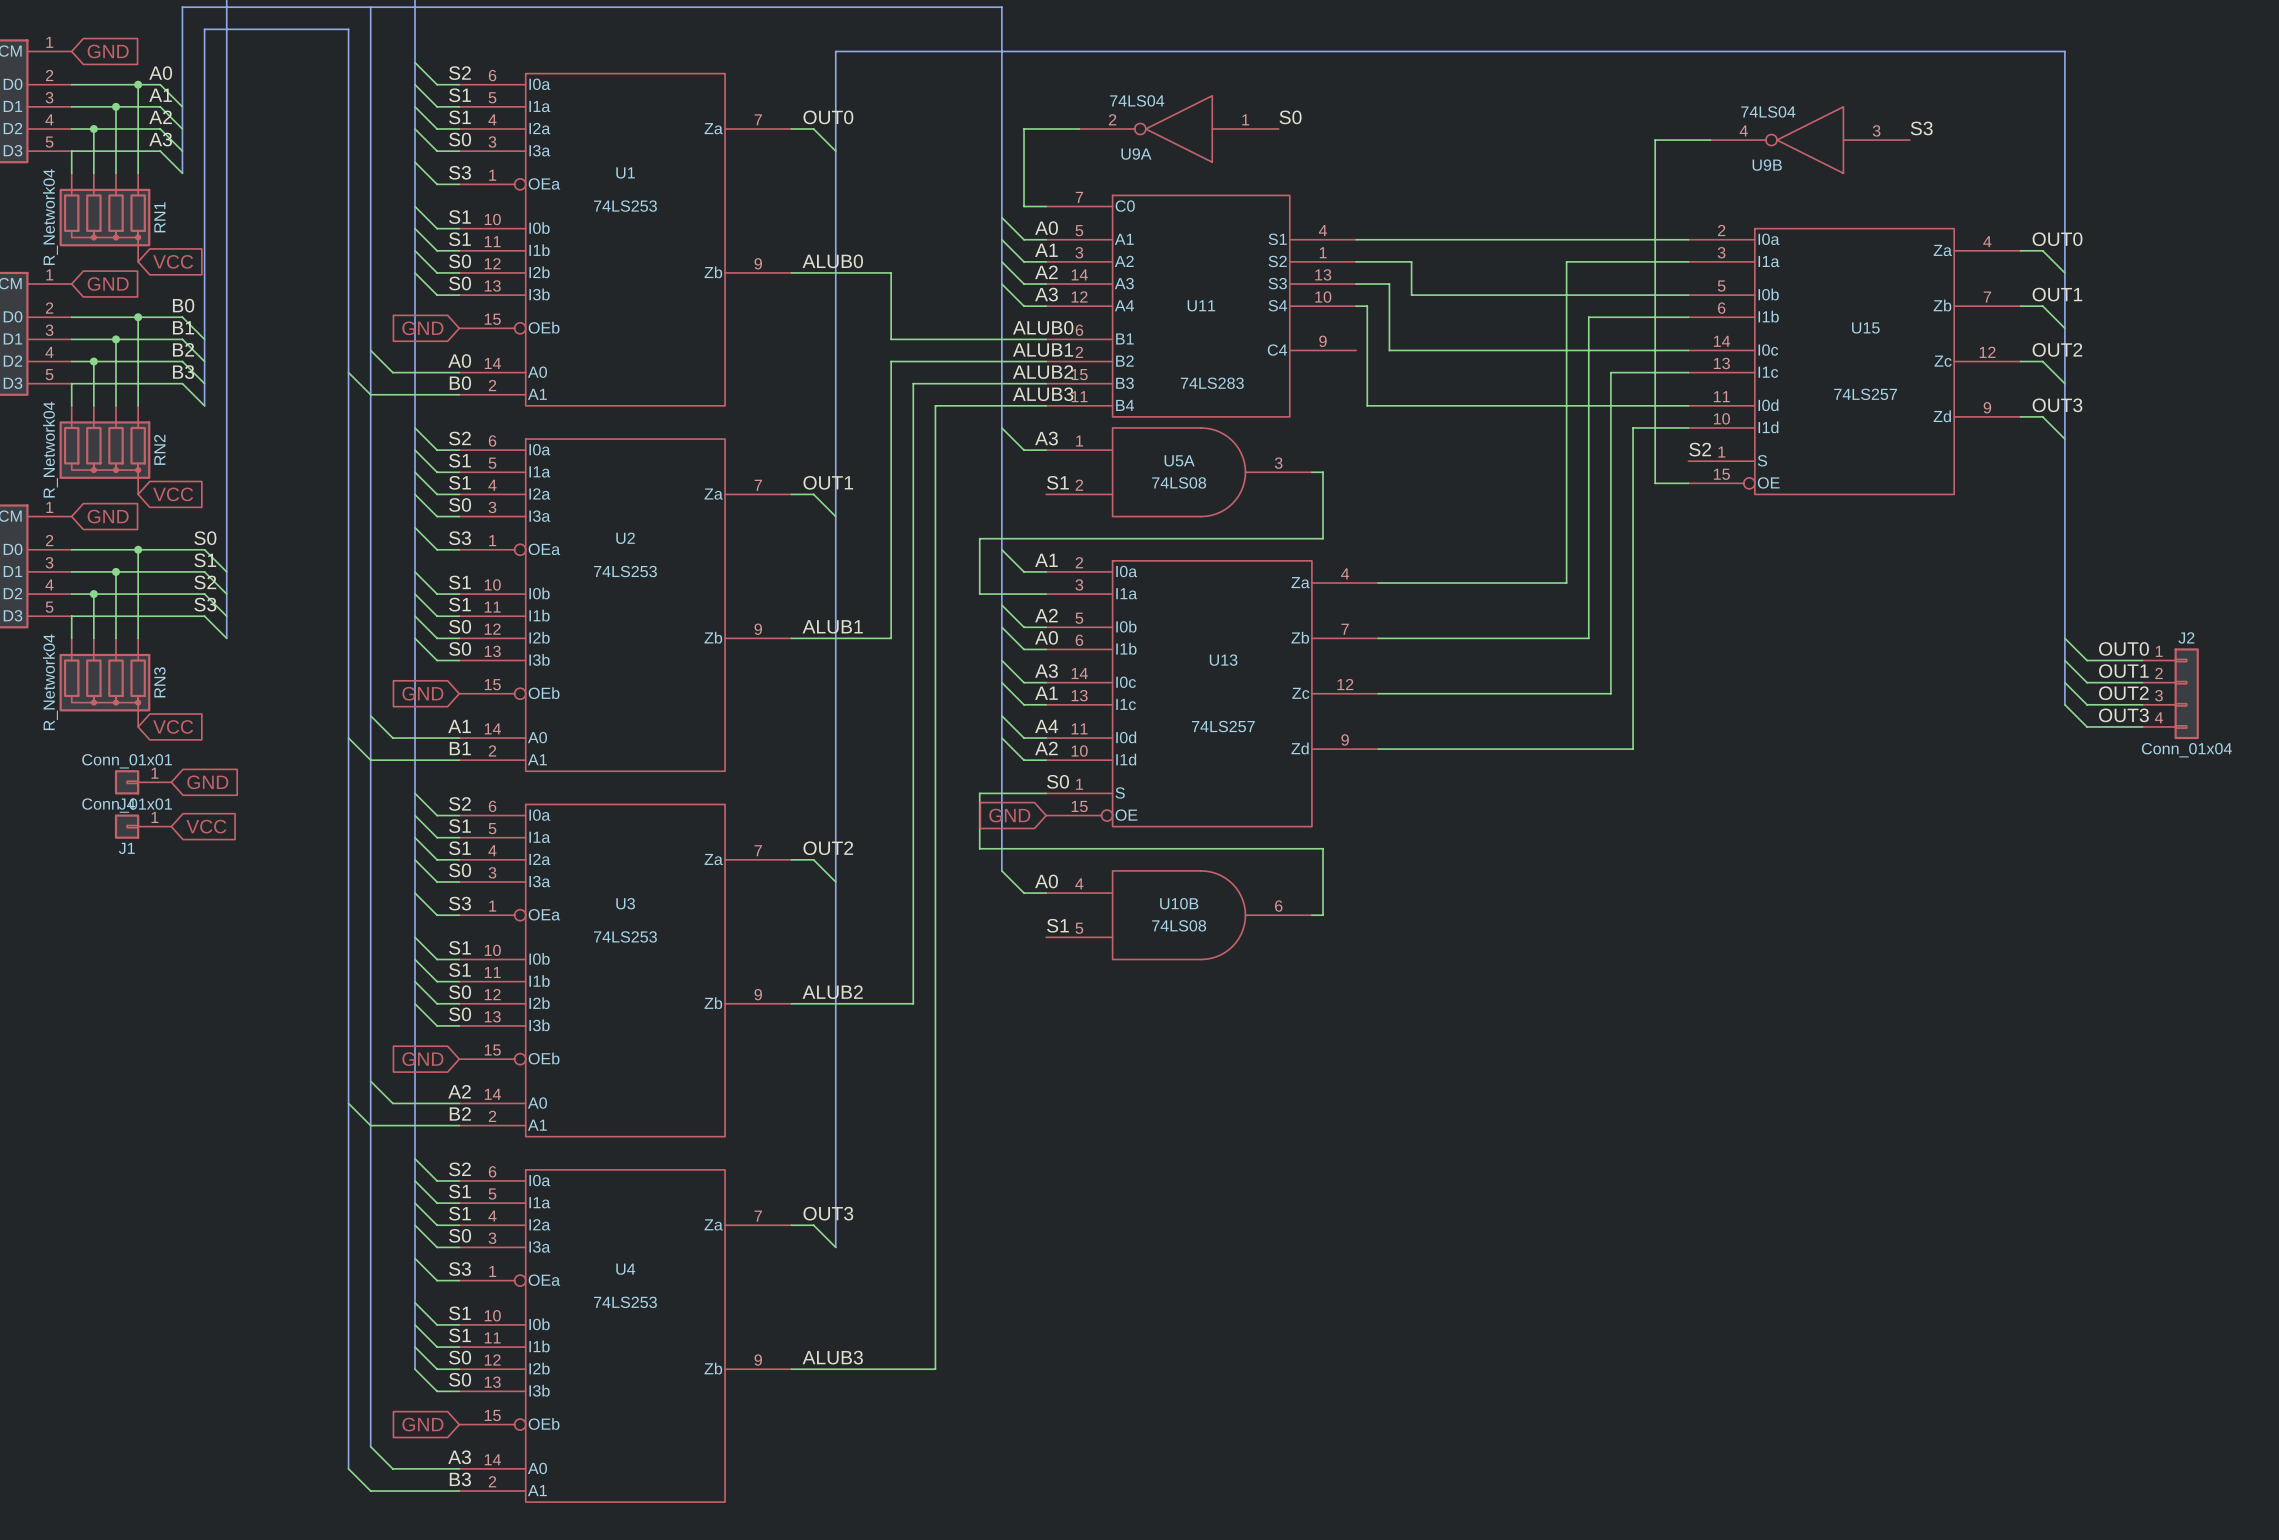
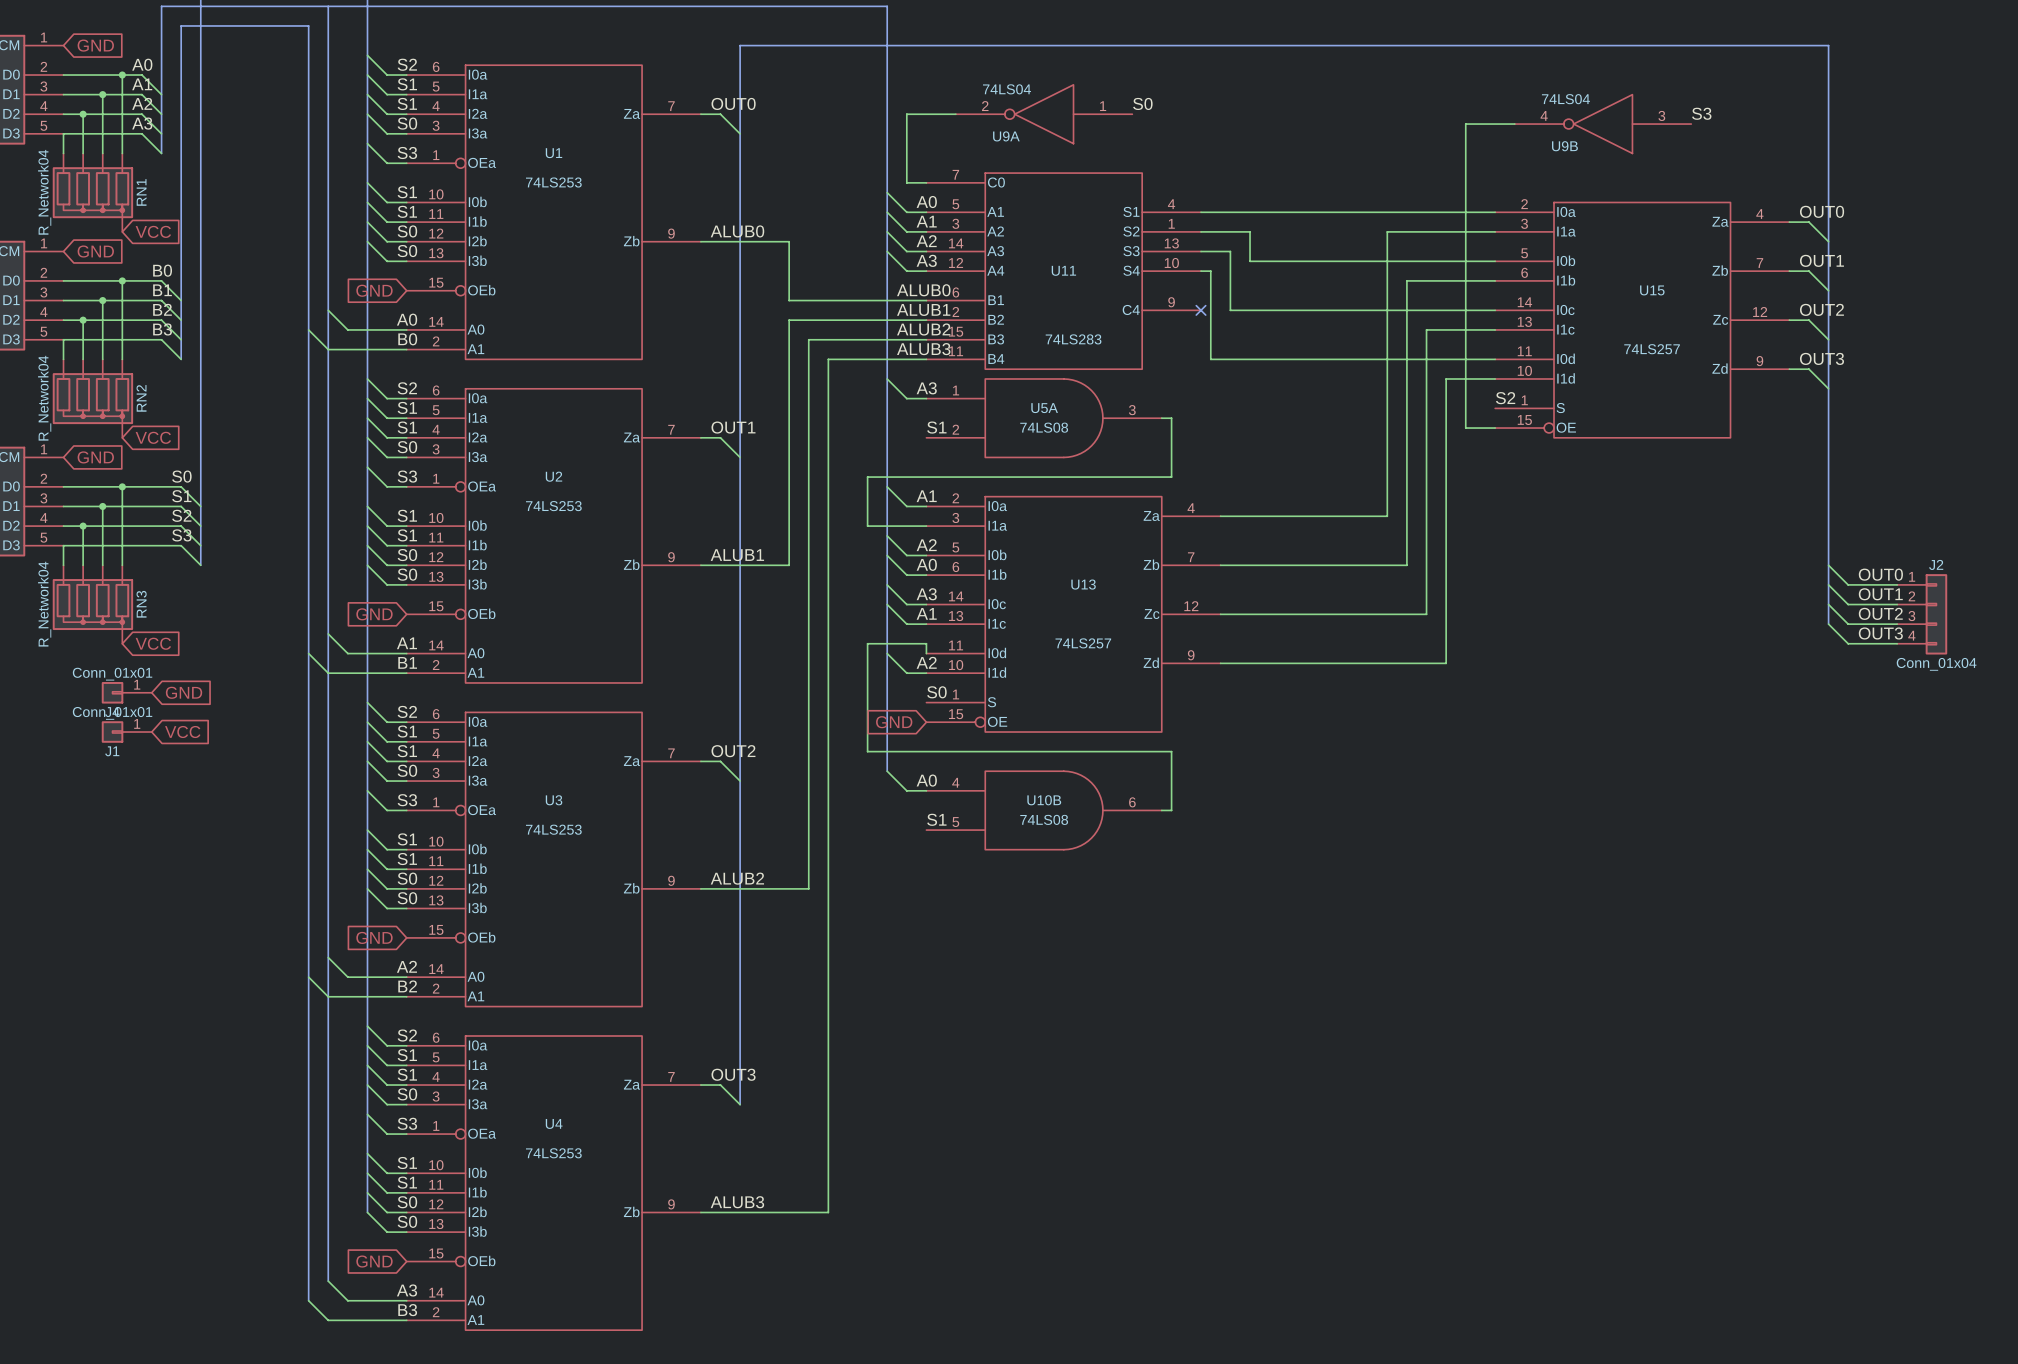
no-connect mark: none -> (1200, 310)
wire: (1001, 715) (1024, 738) (1046, 738) -> none
label: A4 (1046, 726) -> none
wire: (979, 793) (1046, 793) -> (867, 702) (867, 643) (926, 643) (926, 653)

